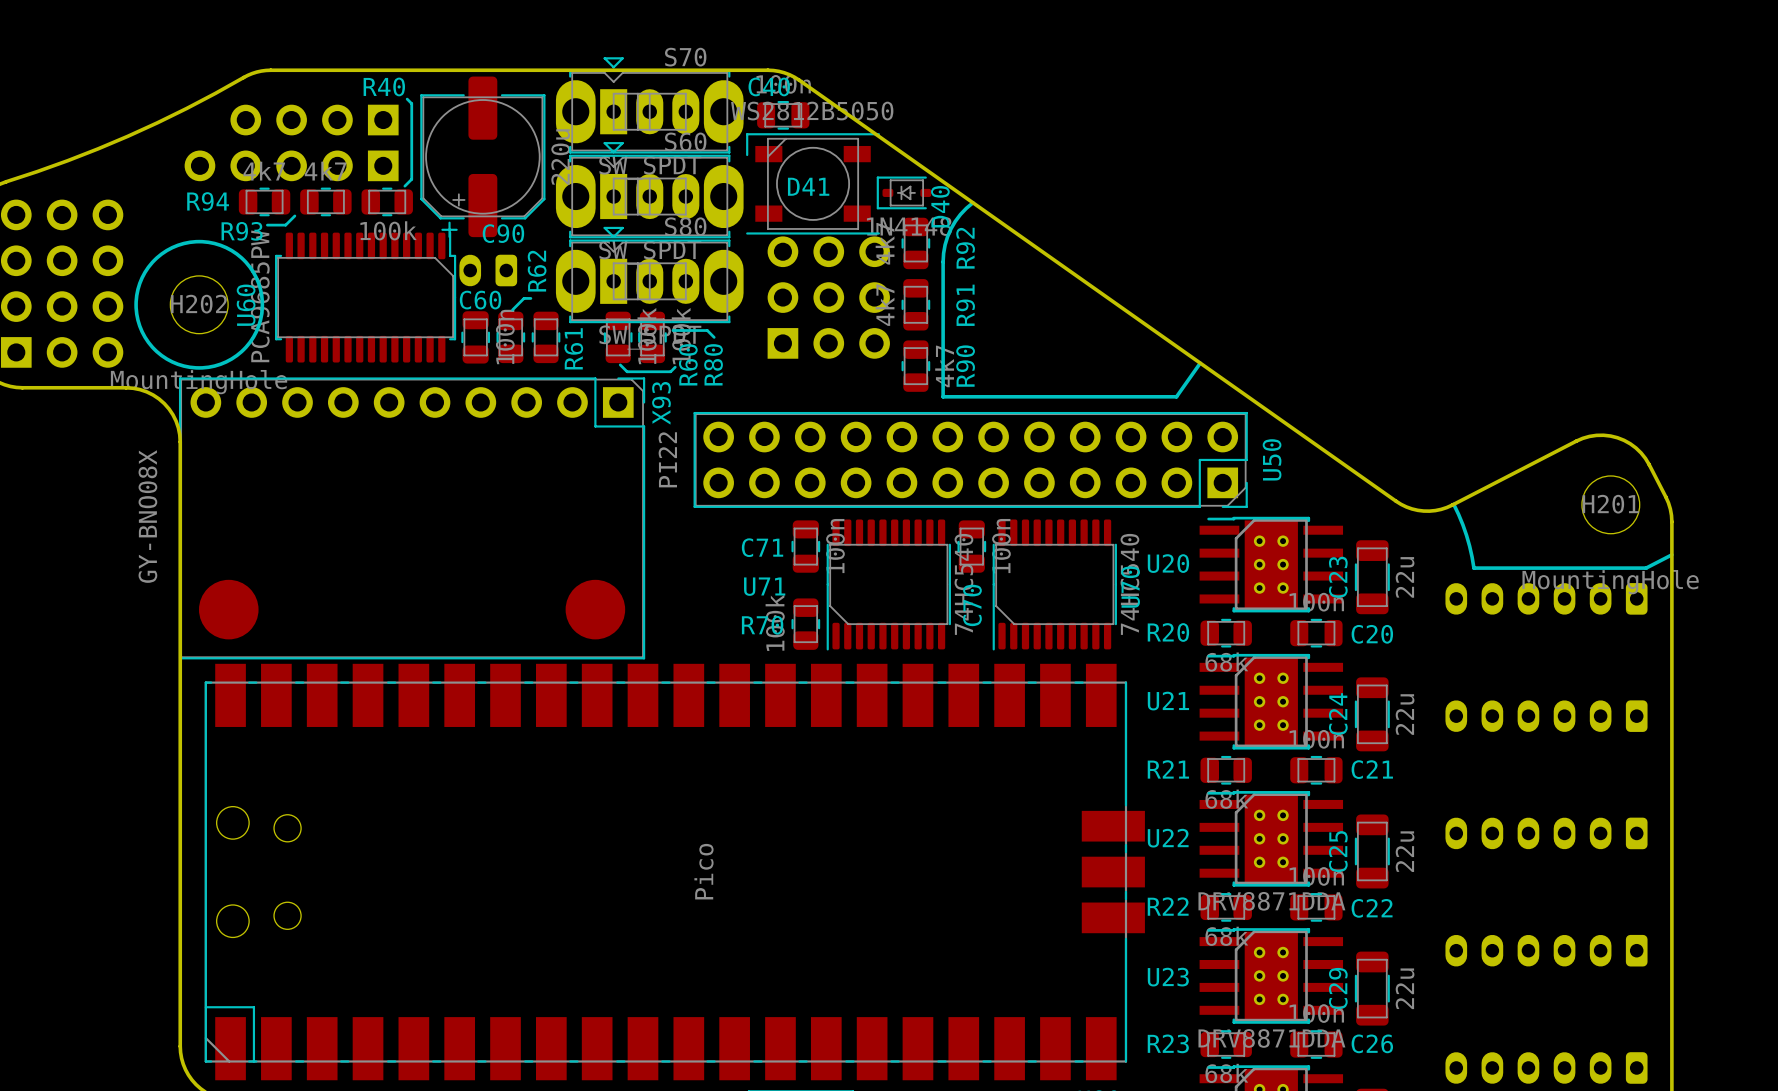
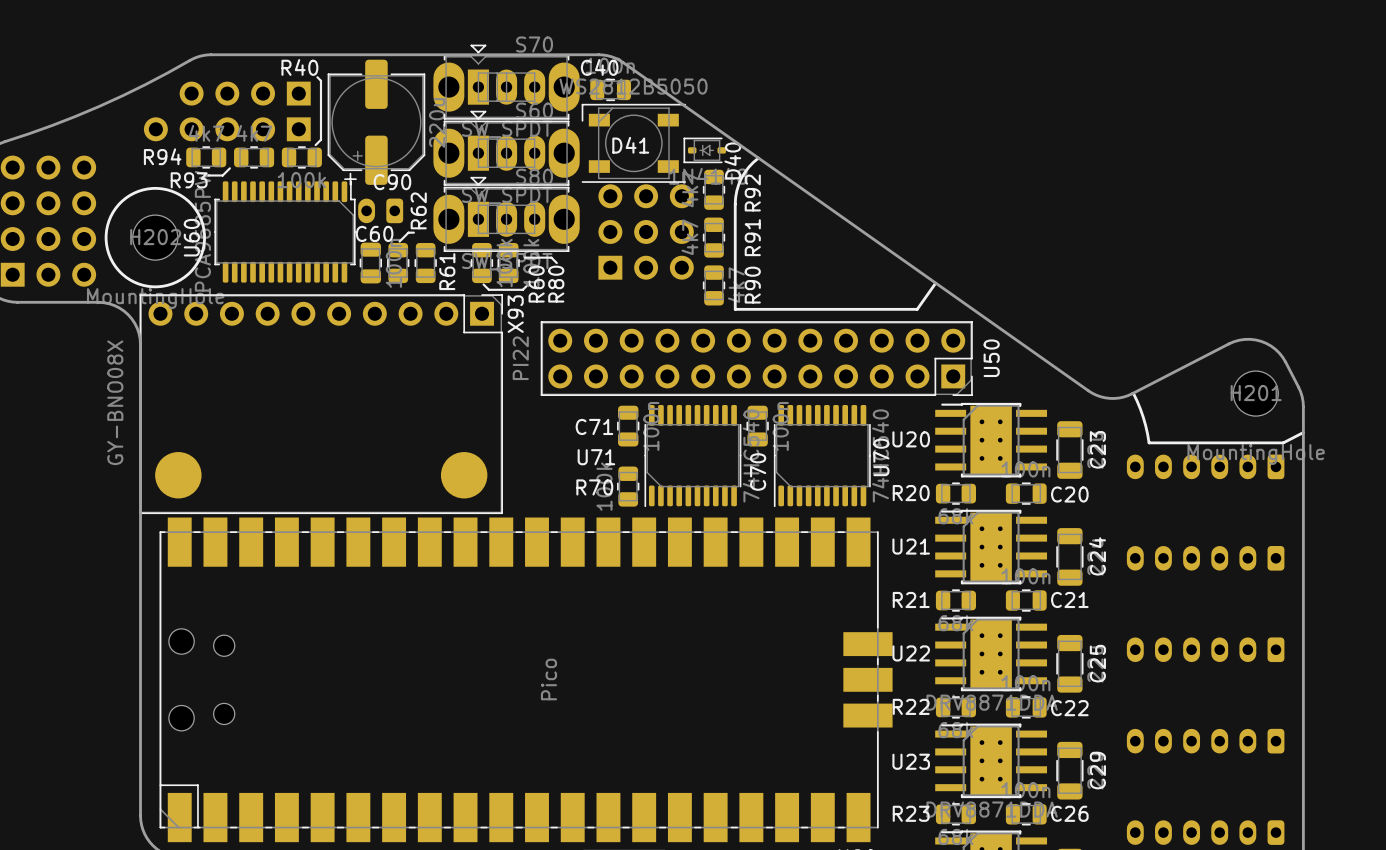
C23 name position: C23 (1338, 577) -> C23 (1097, 449)
C24 name position: C24 (1338, 714) -> C24 (1097, 556)
C25 name position: C25 (1338, 851) -> C25 (1097, 663)
C29 name position: C29 (1338, 988) -> C29 (1097, 770)

